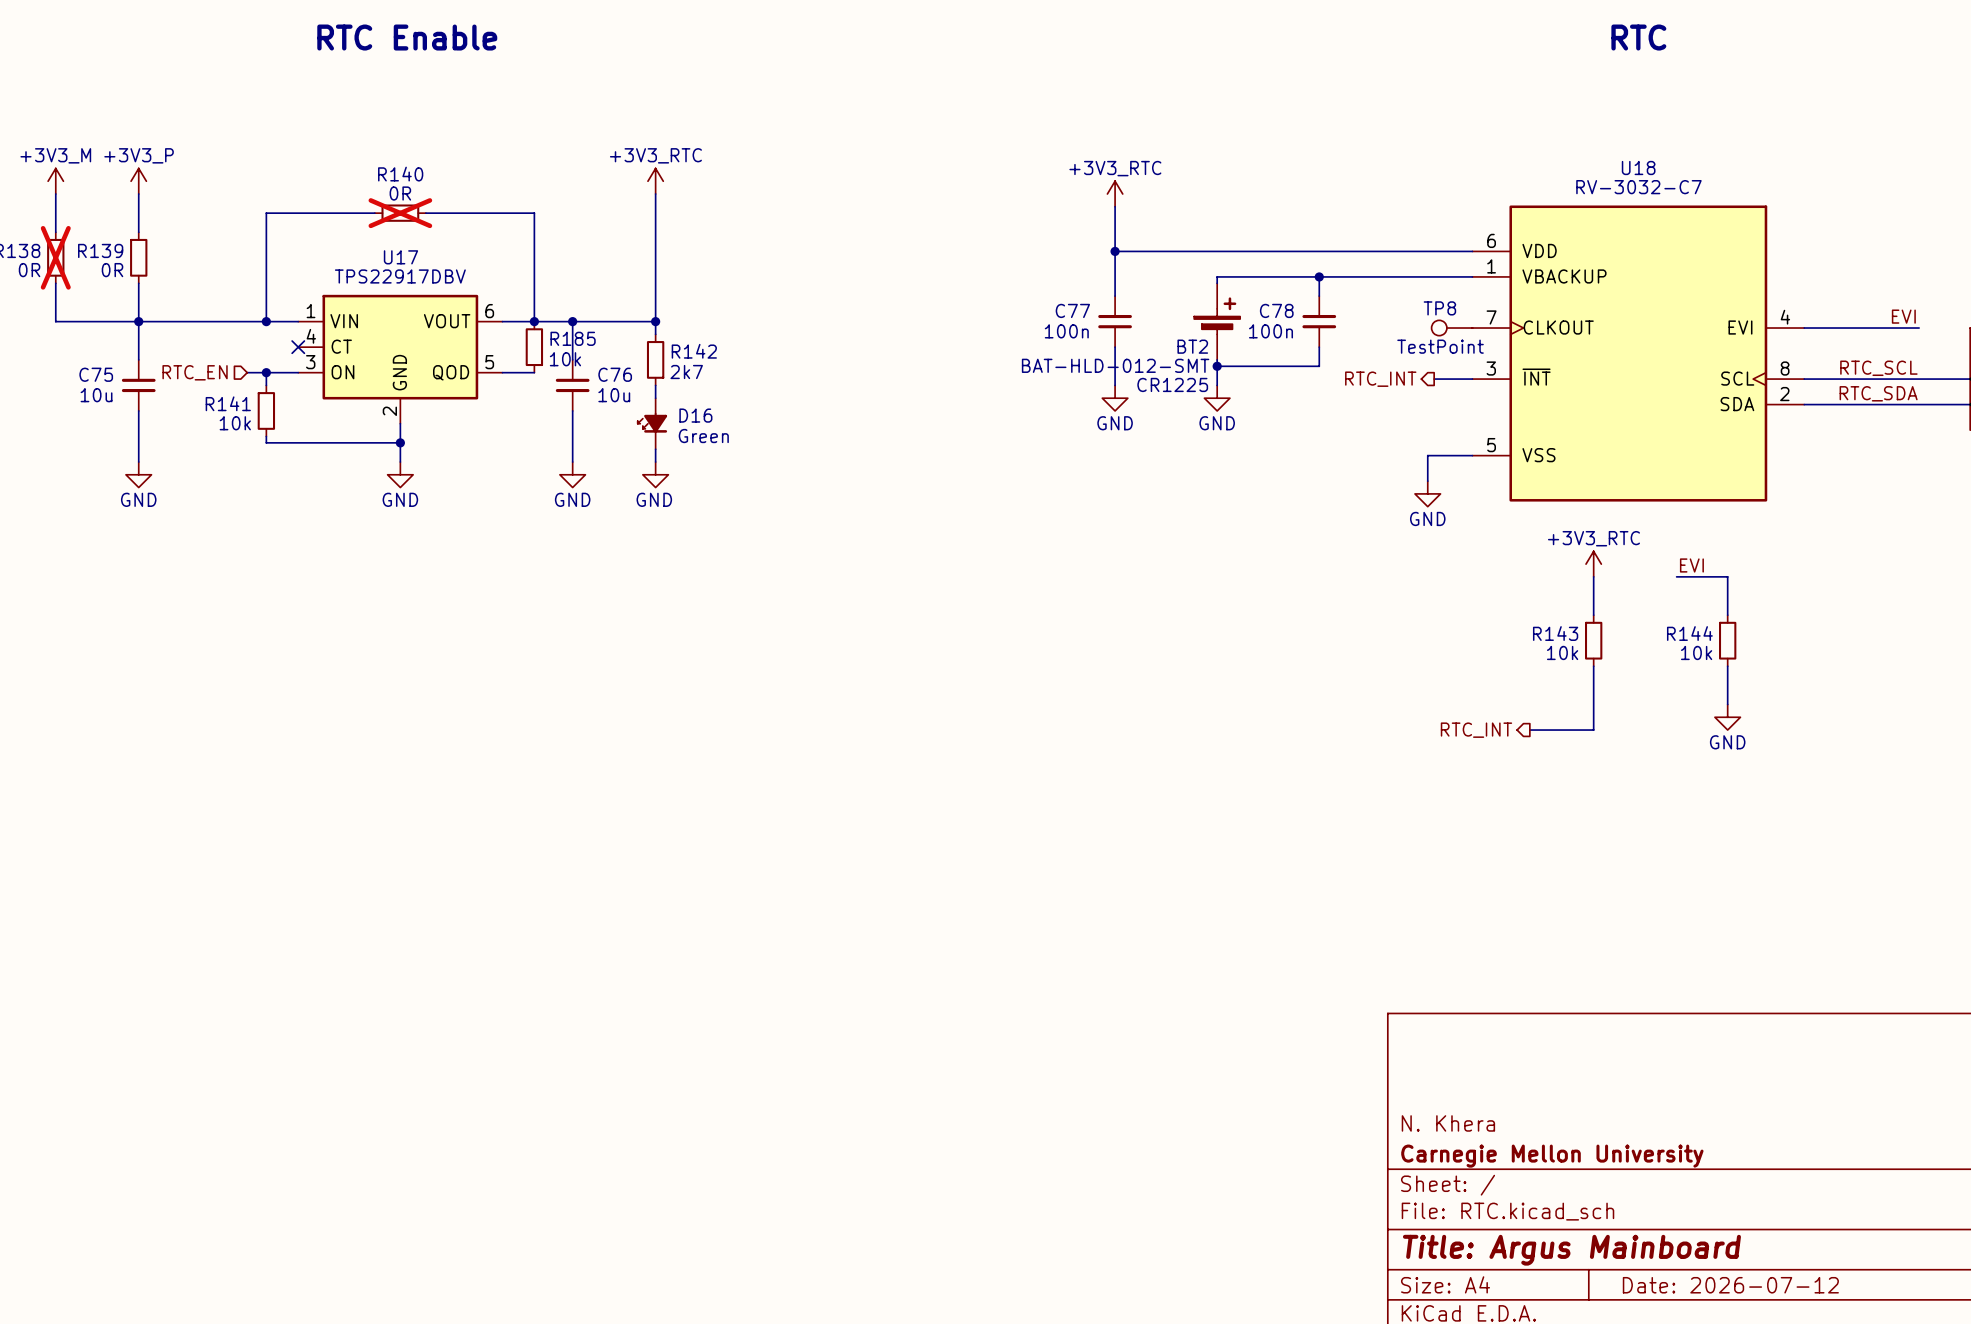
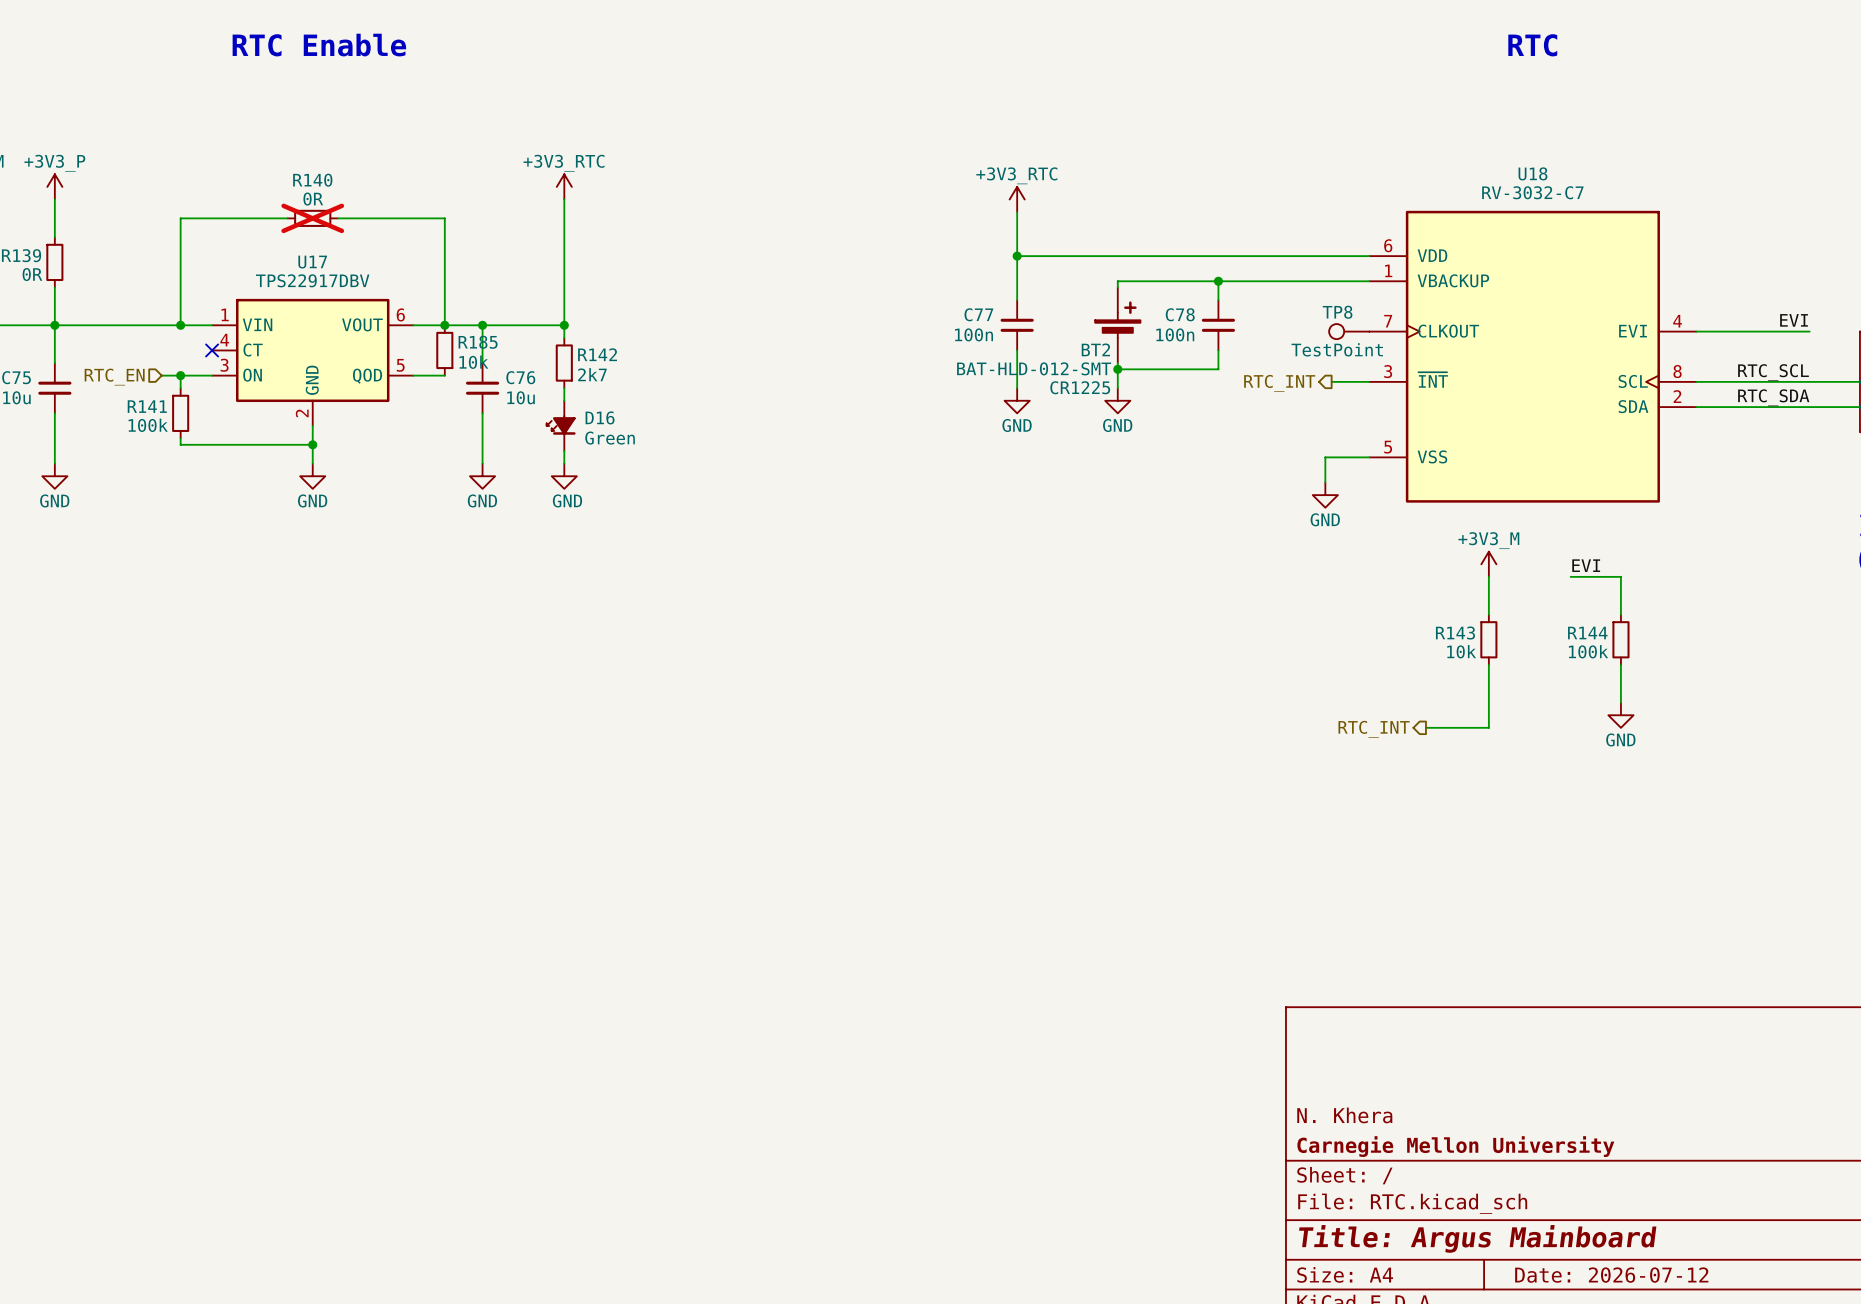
R141 value: 10k (235, 423) -> 100k (148, 425)
power symbol: +3V3_RTC (1593, 564) -> +3V3_M (1488, 564)
R144 value: 10k (1696, 652) -> 100k (1588, 651)

